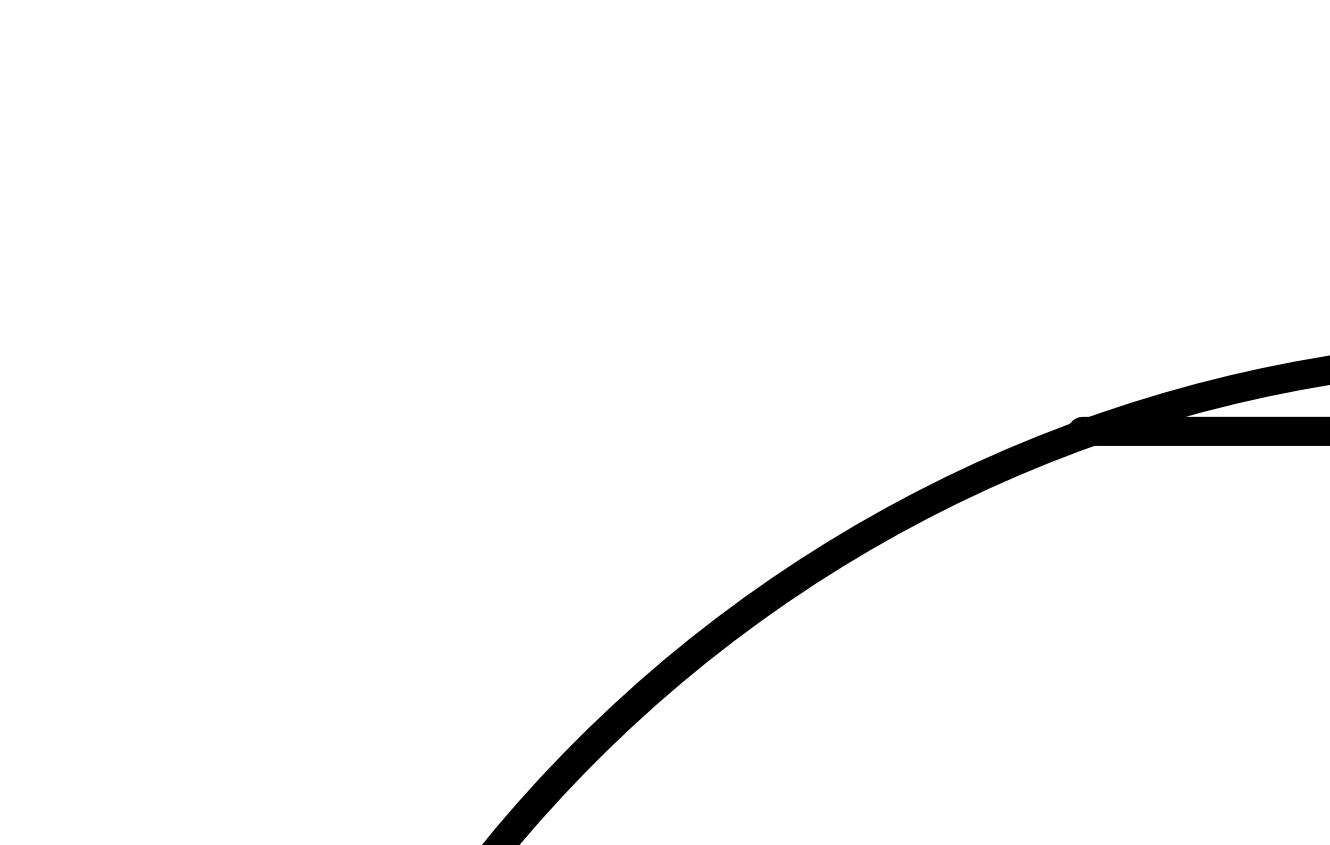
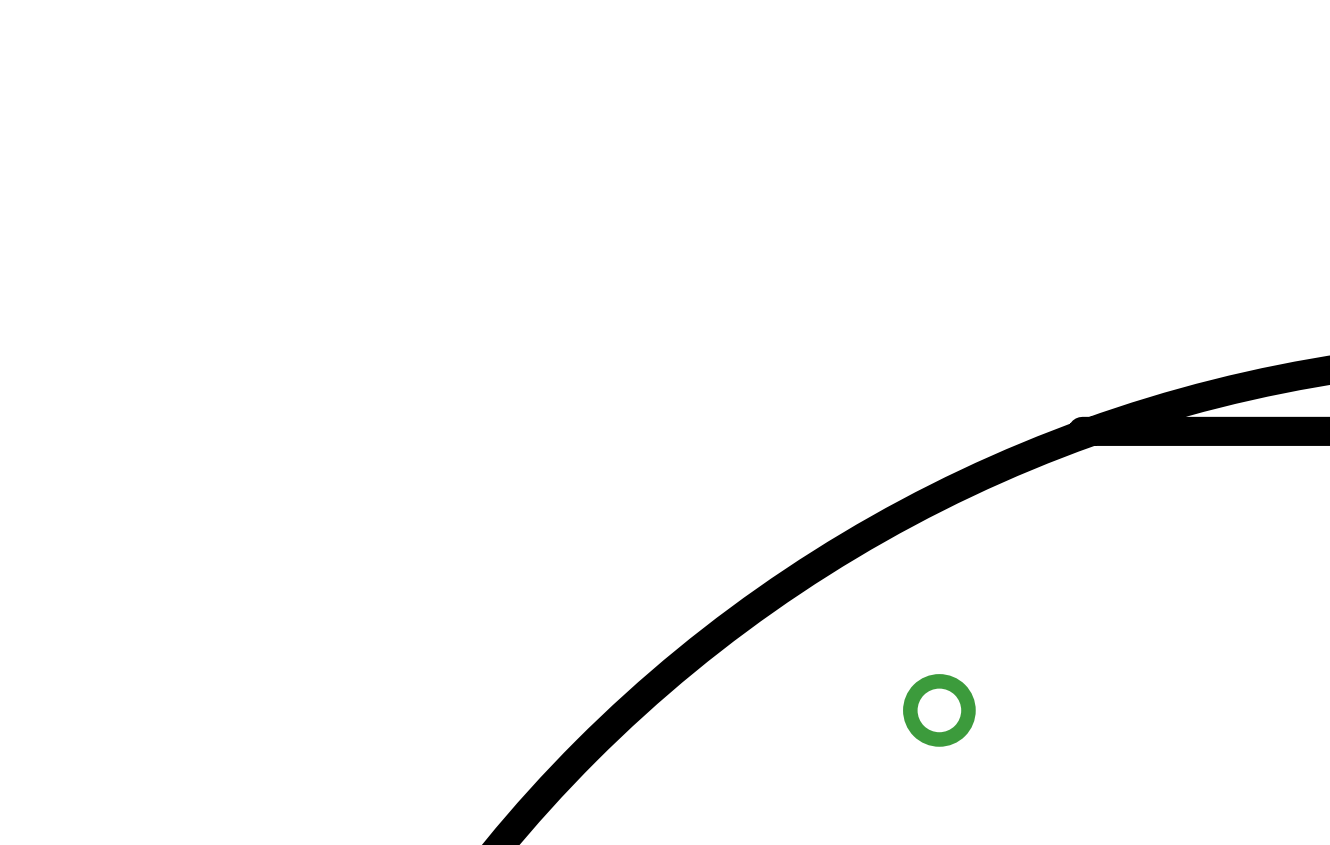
via: none -> (939, 710)

